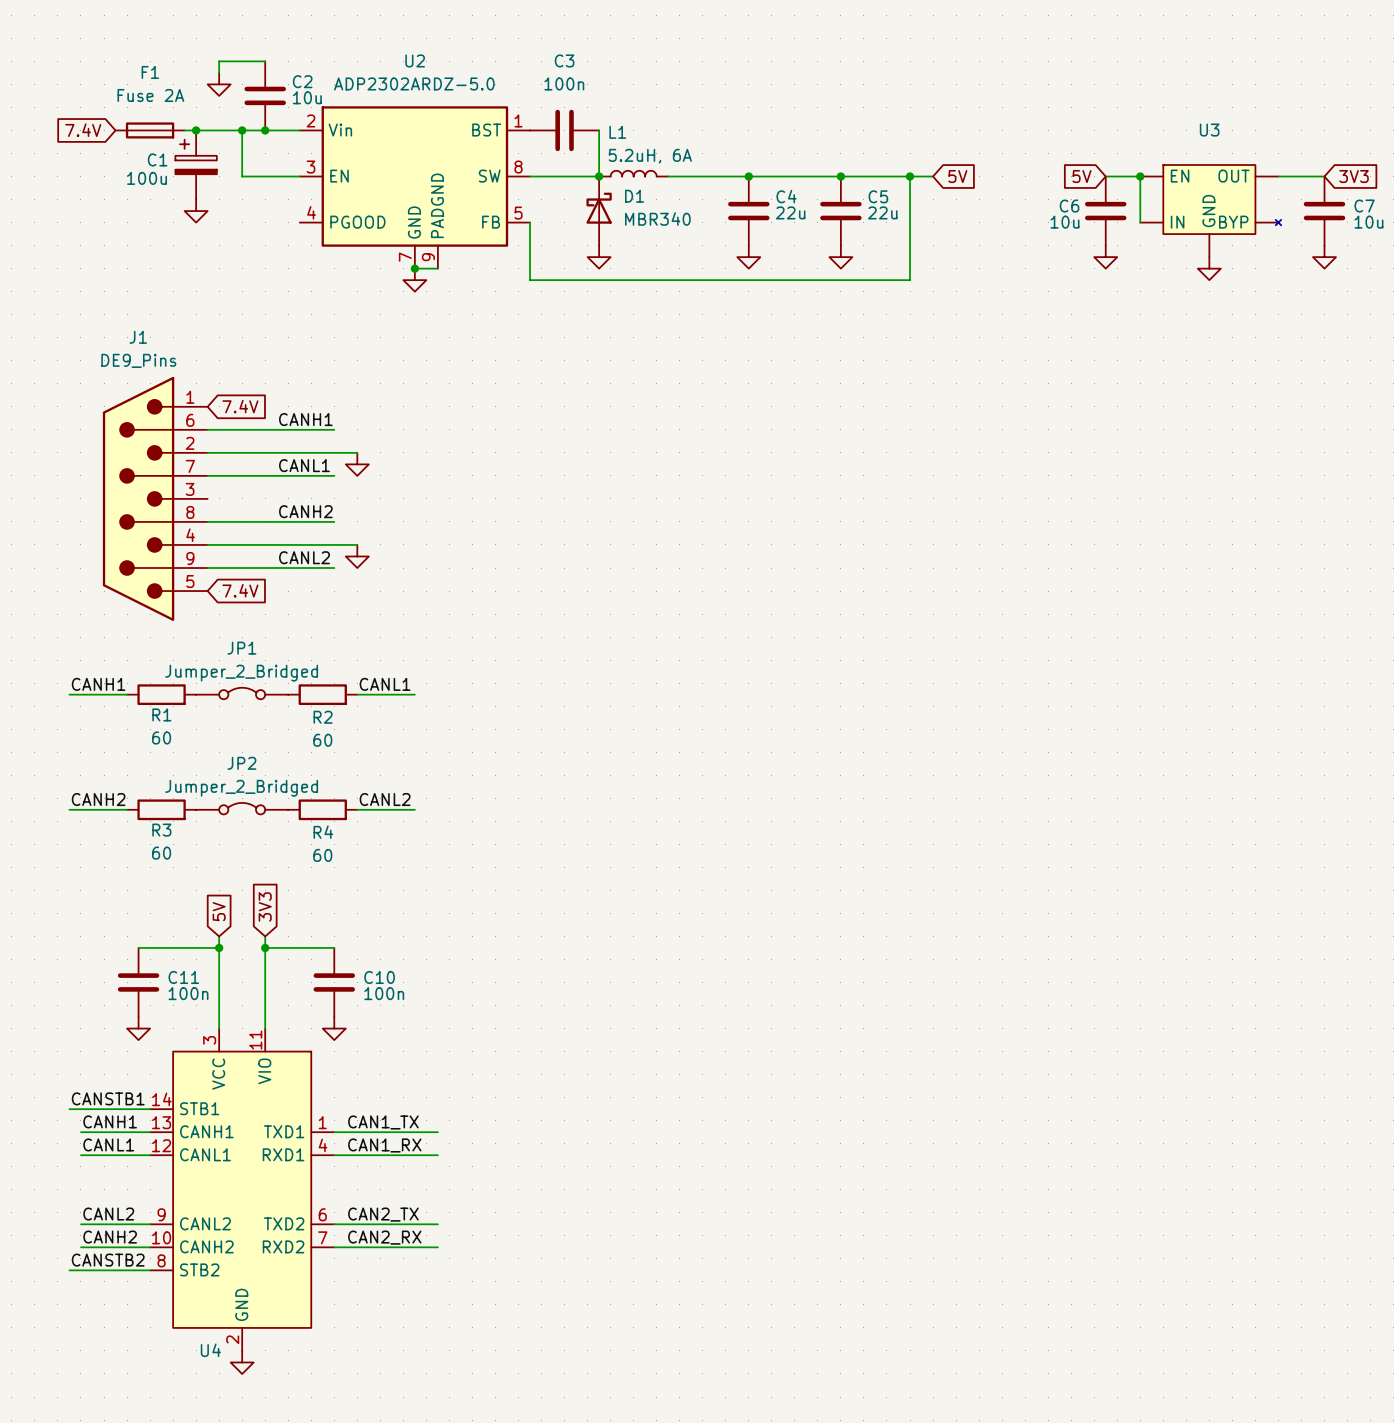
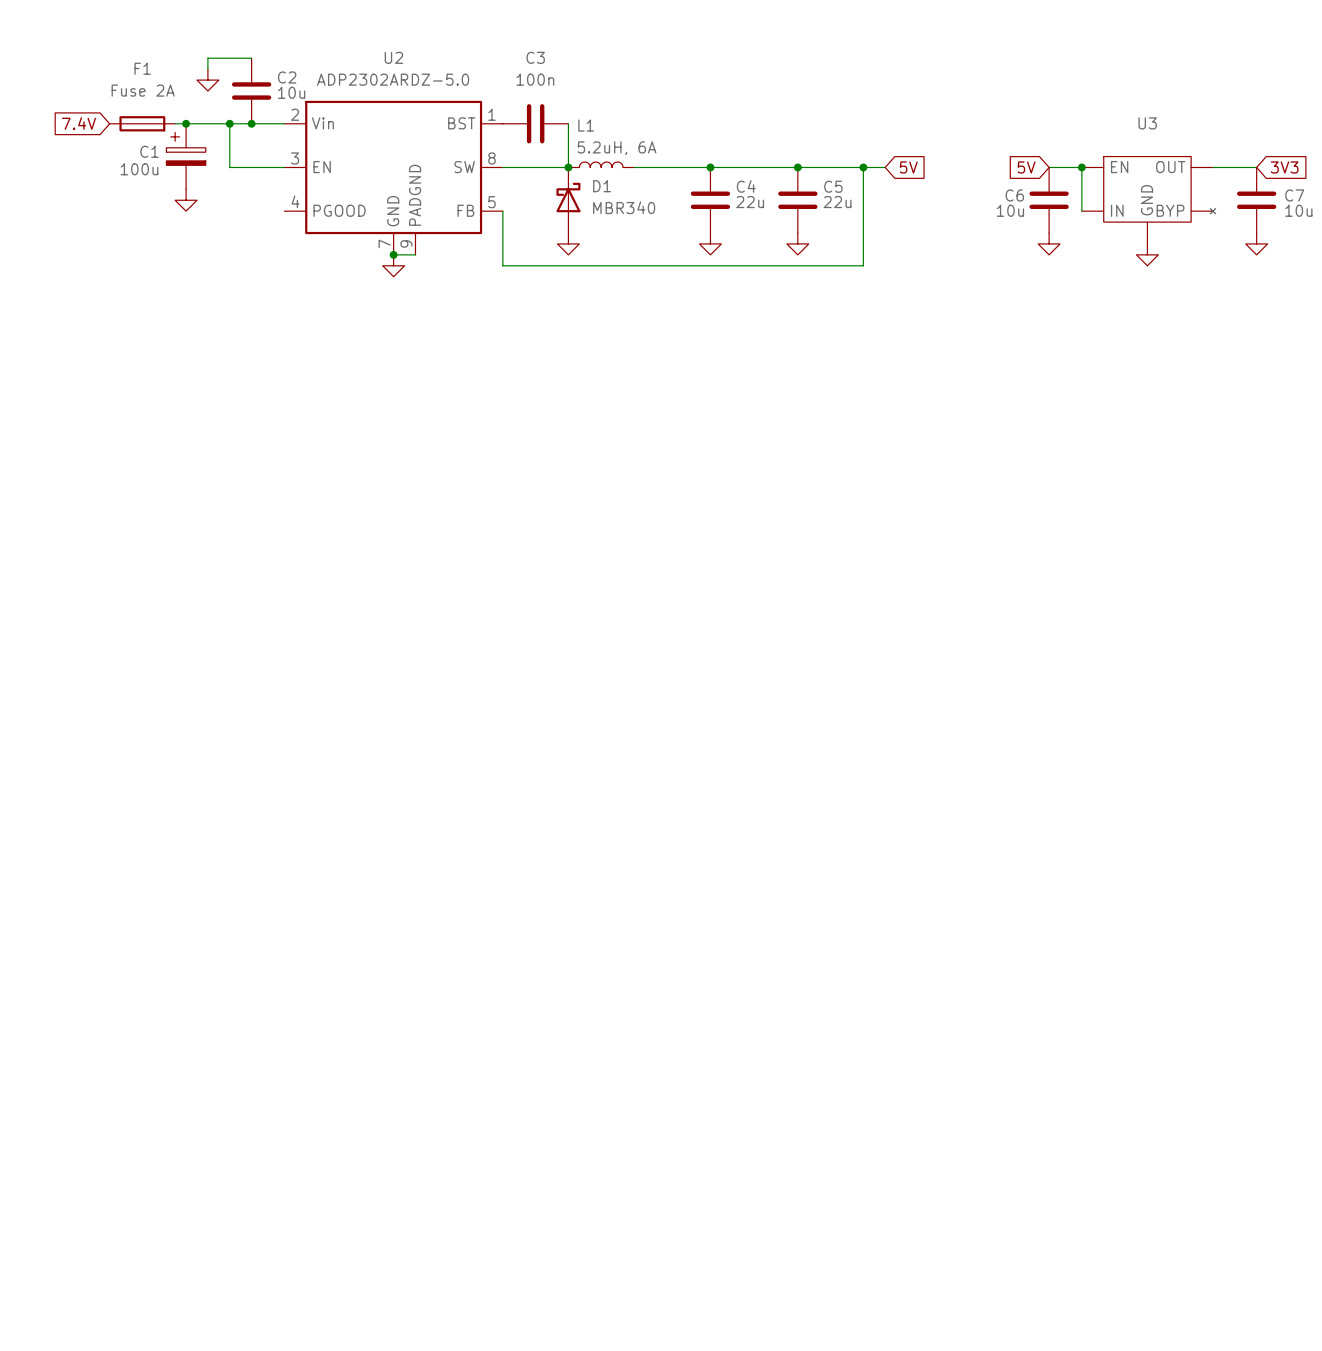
global label: 7.4V (240, 406) -> none
label: CANH1 (305, 419) -> none
wire: (207, 429) (334, 429) -> none
wire: (207, 452) (357, 452) -> none
power symbol: (357, 464) -> none
label: CANL1 (304, 465) -> none
wire: (207, 475) (334, 475) -> none
J1: DE9_Pins (155, 498) -> none
label: CANH2 (305, 511) -> none
wire: (207, 521) (334, 521) -> none
wire: (207, 544) (357, 544) -> none
power symbol: (357, 556) -> none
label: CANL2 (304, 557) -> none
wire: (207, 568) (334, 568) -> none
global label: 7.4V (240, 590) -> none
label: CANH1 (98, 684) -> none
label: CANL1 (385, 684) -> none
JP1: Jumper_2_Bridged (242, 693) -> none
wire: (69, 694) (127, 694) -> none
R1: 60 (161, 694) -> none
R2: 60 (322, 694) -> none
wire: (357, 694) (414, 694) -> none
label: CANH2 (98, 799) -> none
label: CANL2 (385, 799) -> none
JP2: Jumper_2_Bridged (242, 808) -> none
wire: (69, 809) (127, 809) -> none
R3: 60 (161, 809) -> none
R4: 60 (322, 809) -> none
wire: (357, 809) (414, 809) -> none
global label: 3V3 (265, 906) -> none
global label: 5V (219, 911) -> none
wire: (219, 936) (219, 1028) -> none
wire: (265, 936) (265, 1028) -> none
wire: (138, 947) (219, 947) -> none
junction: (219, 947) -> none
wire: (265, 947) (334, 947) -> none
junction: (265, 947) -> none
C11: 100n (138, 982) -> none
C10: 100n (334, 982) -> none
power symbol: (138, 1028) -> none
power symbol: (334, 1028) -> none
label: CANSTB1 (108, 1098) -> none
wire: (69, 1109) (150, 1109) -> none
label: CANH1 (110, 1121) -> none
label: CAN1_TX (383, 1122) -> none
wire: (80, 1132) (150, 1132) -> none
wire: (334, 1132) (437, 1132) -> none
label: CANL1 (108, 1144) -> none
label: CAN1_RX (384, 1145) -> none
wire: (80, 1155) (150, 1155) -> none
wire: (334, 1155) (437, 1155) -> none
U4: (242, 1189) -> none
label: CANL2 (108, 1214) -> none
label: CAN2_TX (383, 1214) -> none
wire: (80, 1224) (150, 1224) -> none
wire: (334, 1224) (437, 1224) -> none
label: CANH2 (110, 1237) -> none
label: CAN2_RX (384, 1237) -> none
wire: (80, 1247) (150, 1247) -> none
wire: (334, 1247) (437, 1247) -> none
label: CANSTB2 (108, 1260) -> none
wire: (69, 1270) (150, 1270) -> none
power symbol: (242, 1362) -> none

